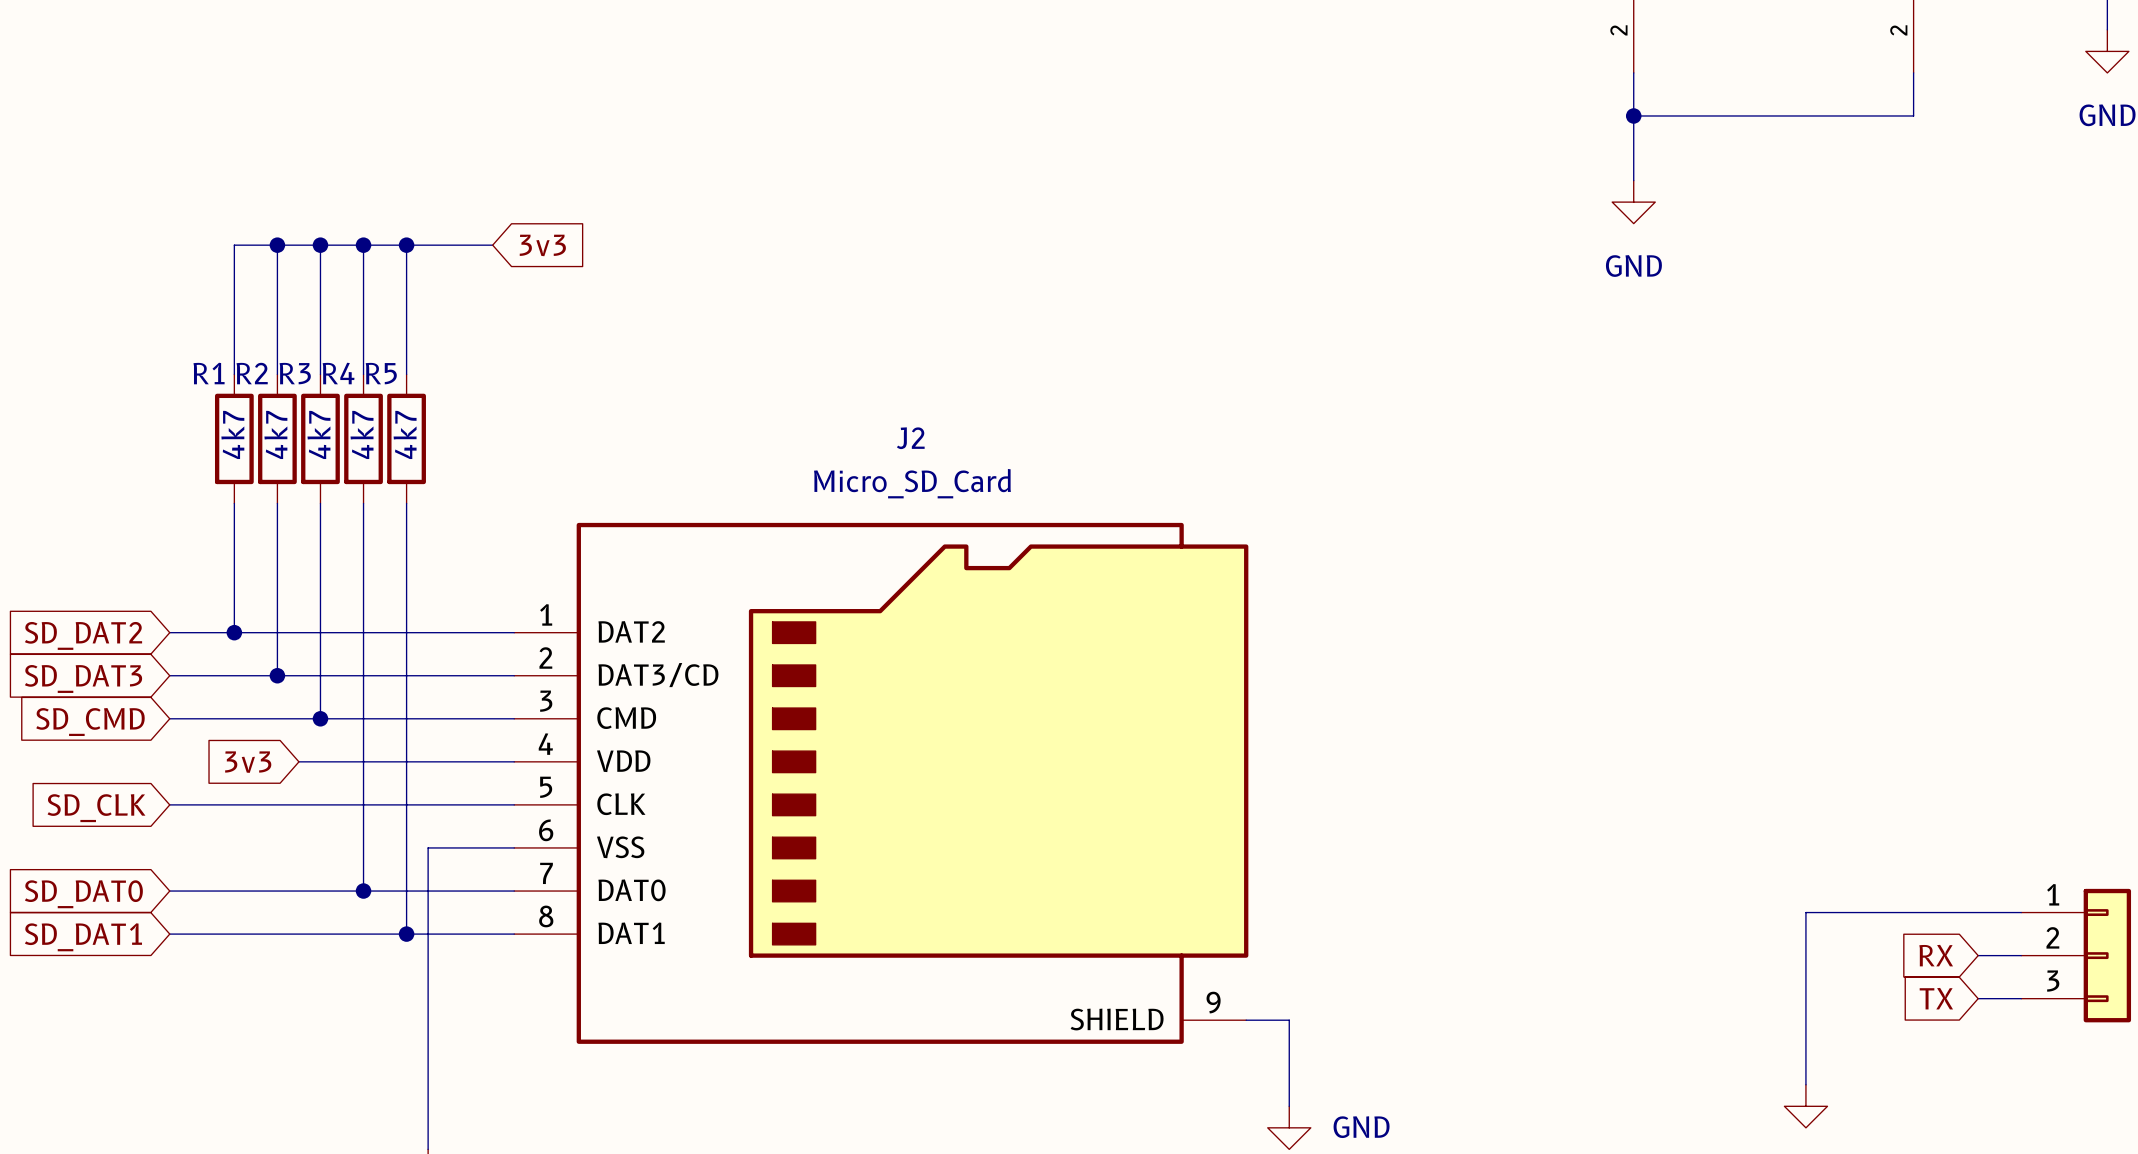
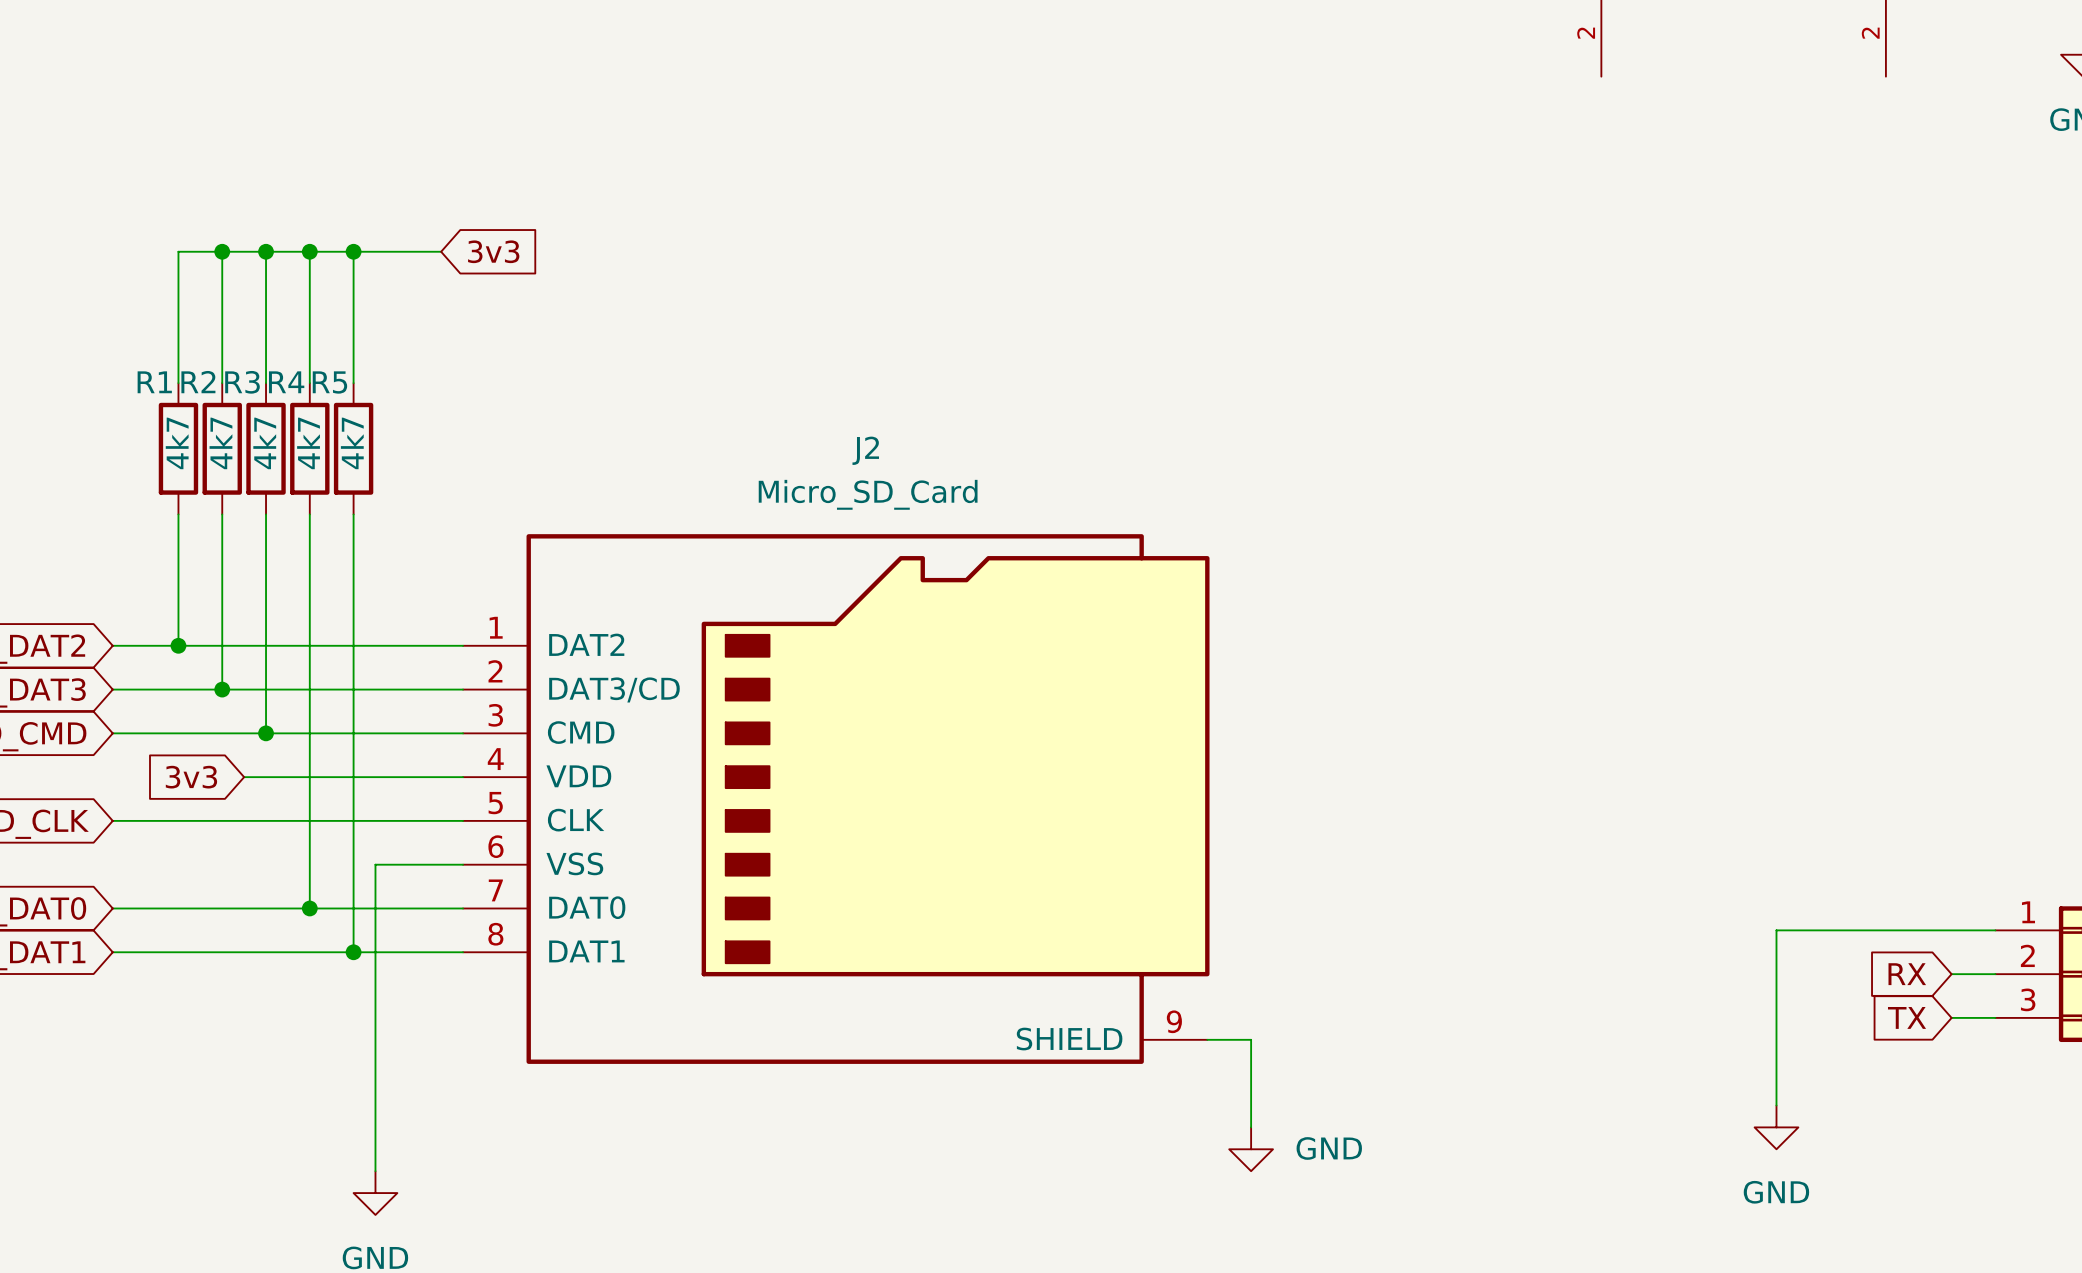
wire: (1633, 72) (1633, 180) -> none
wire: (1913, 72) (1913, 115) (1633, 115) -> none
junction: (1633, 115) -> none
power symbol: GND (1633, 202) -> none

